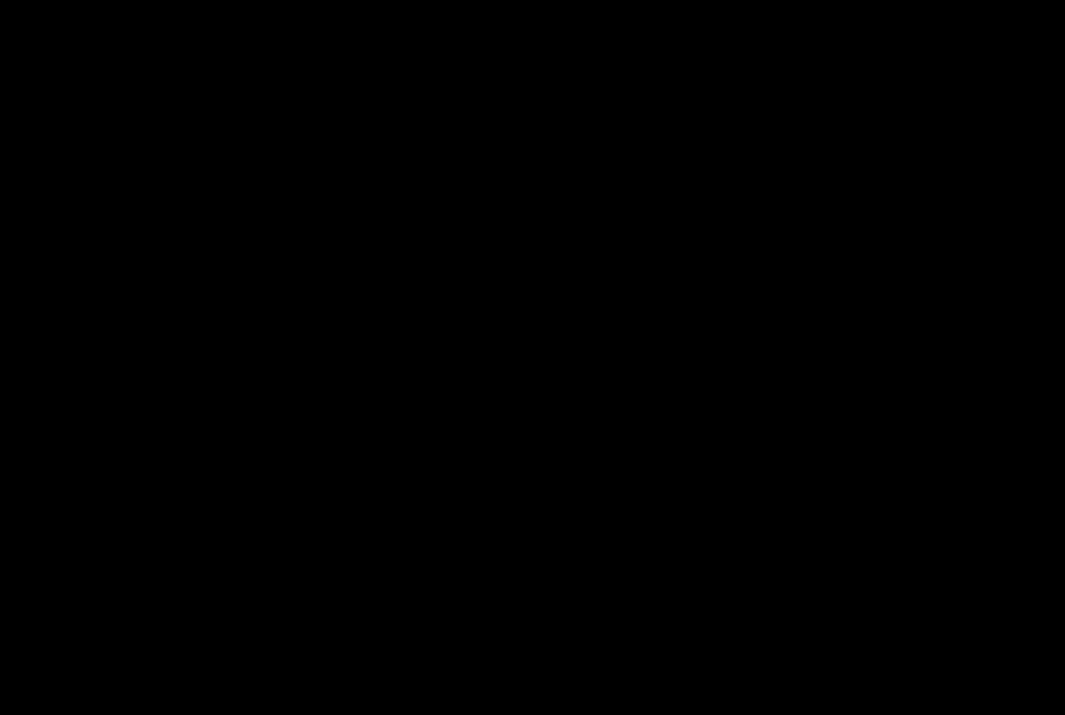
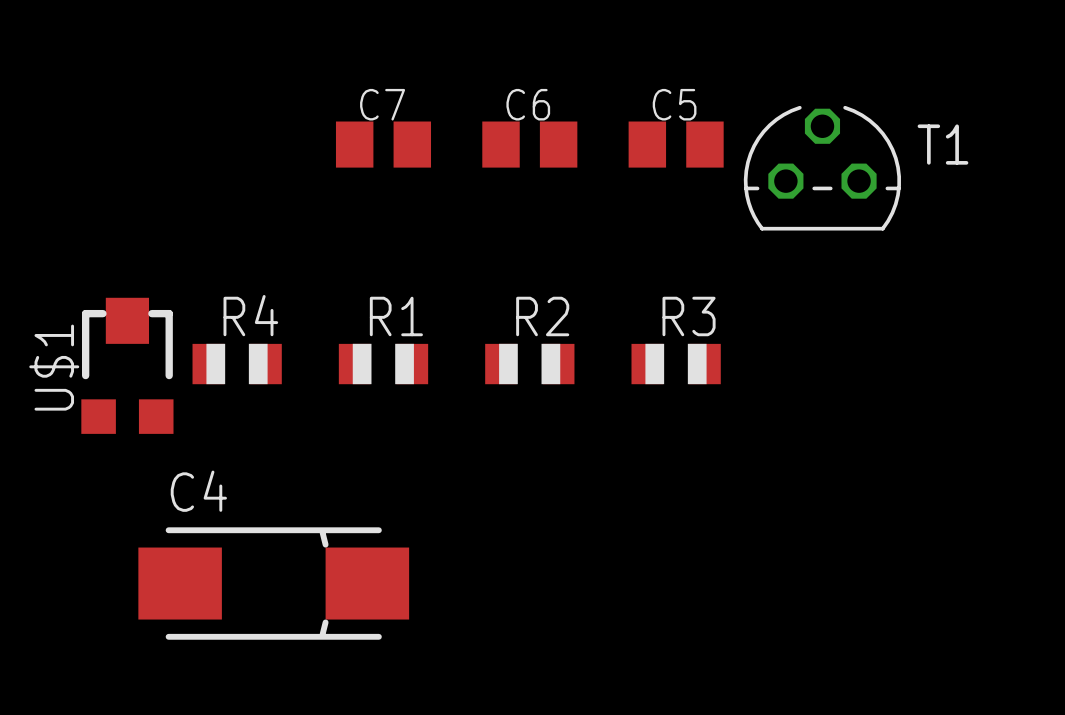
C7: none -> (383, 144)
C6: none -> (529, 144)
C5: none -> (676, 144)
T1: none -> (822, 168)
R4: none -> (237, 364)
R1: none -> (383, 364)
R2: none -> (529, 364)
R3: none -> (676, 364)
U$1: none -> (127, 365)
C4: none -> (273, 583)

